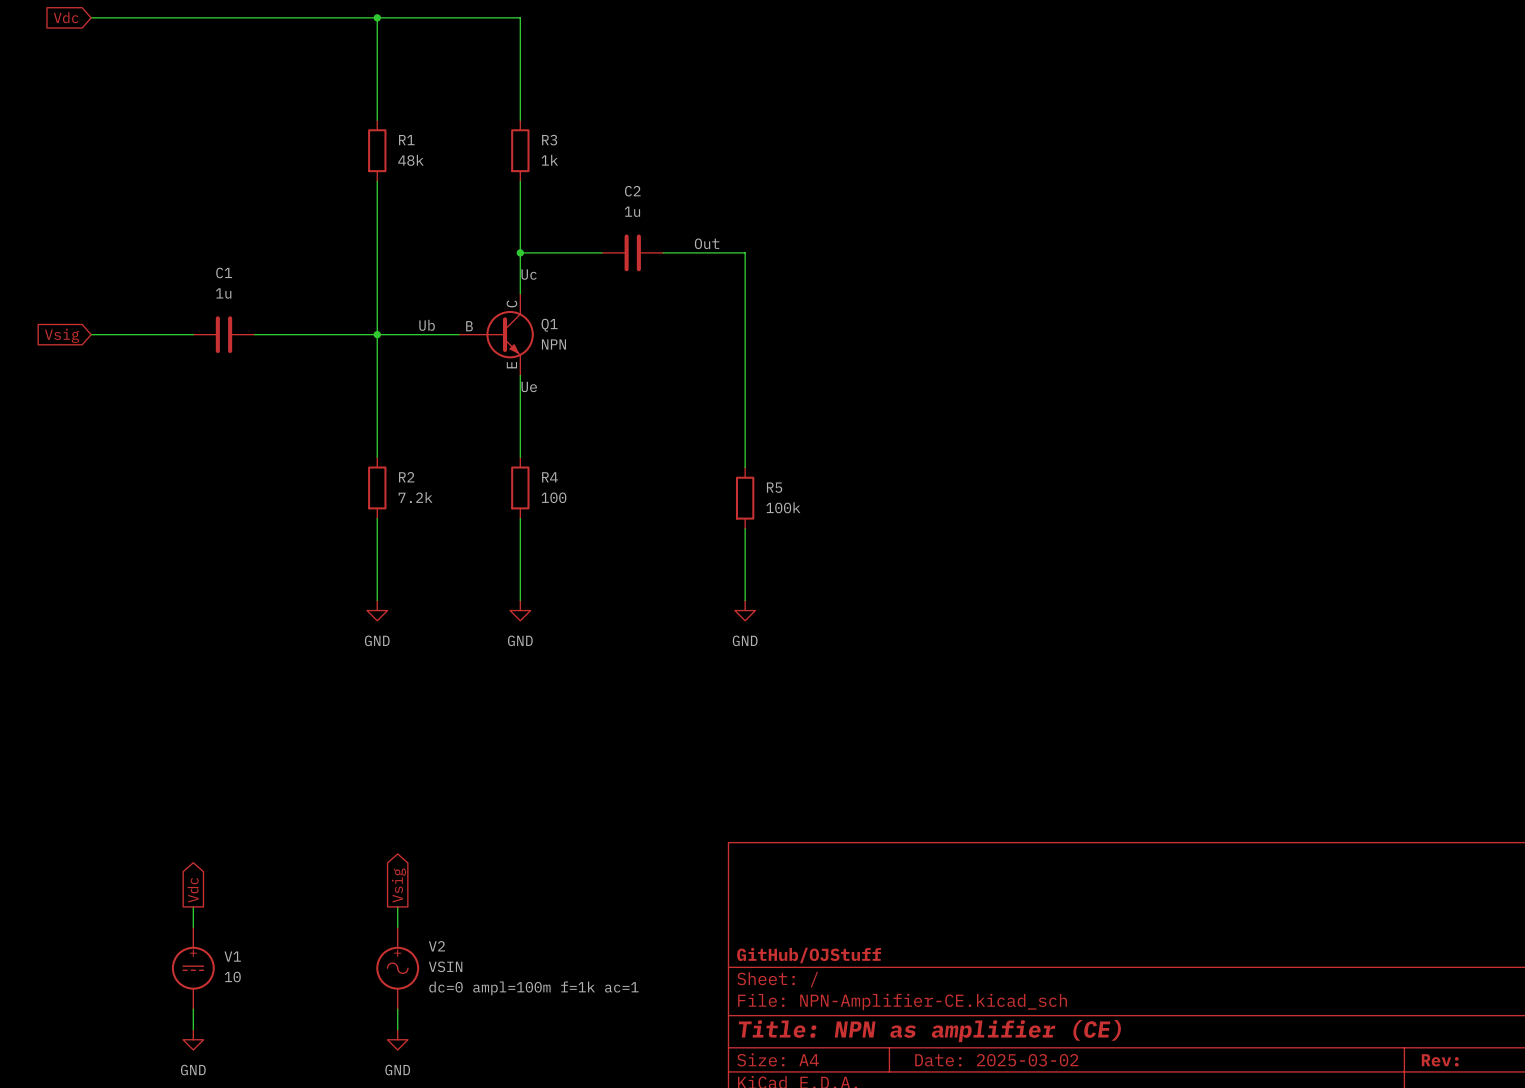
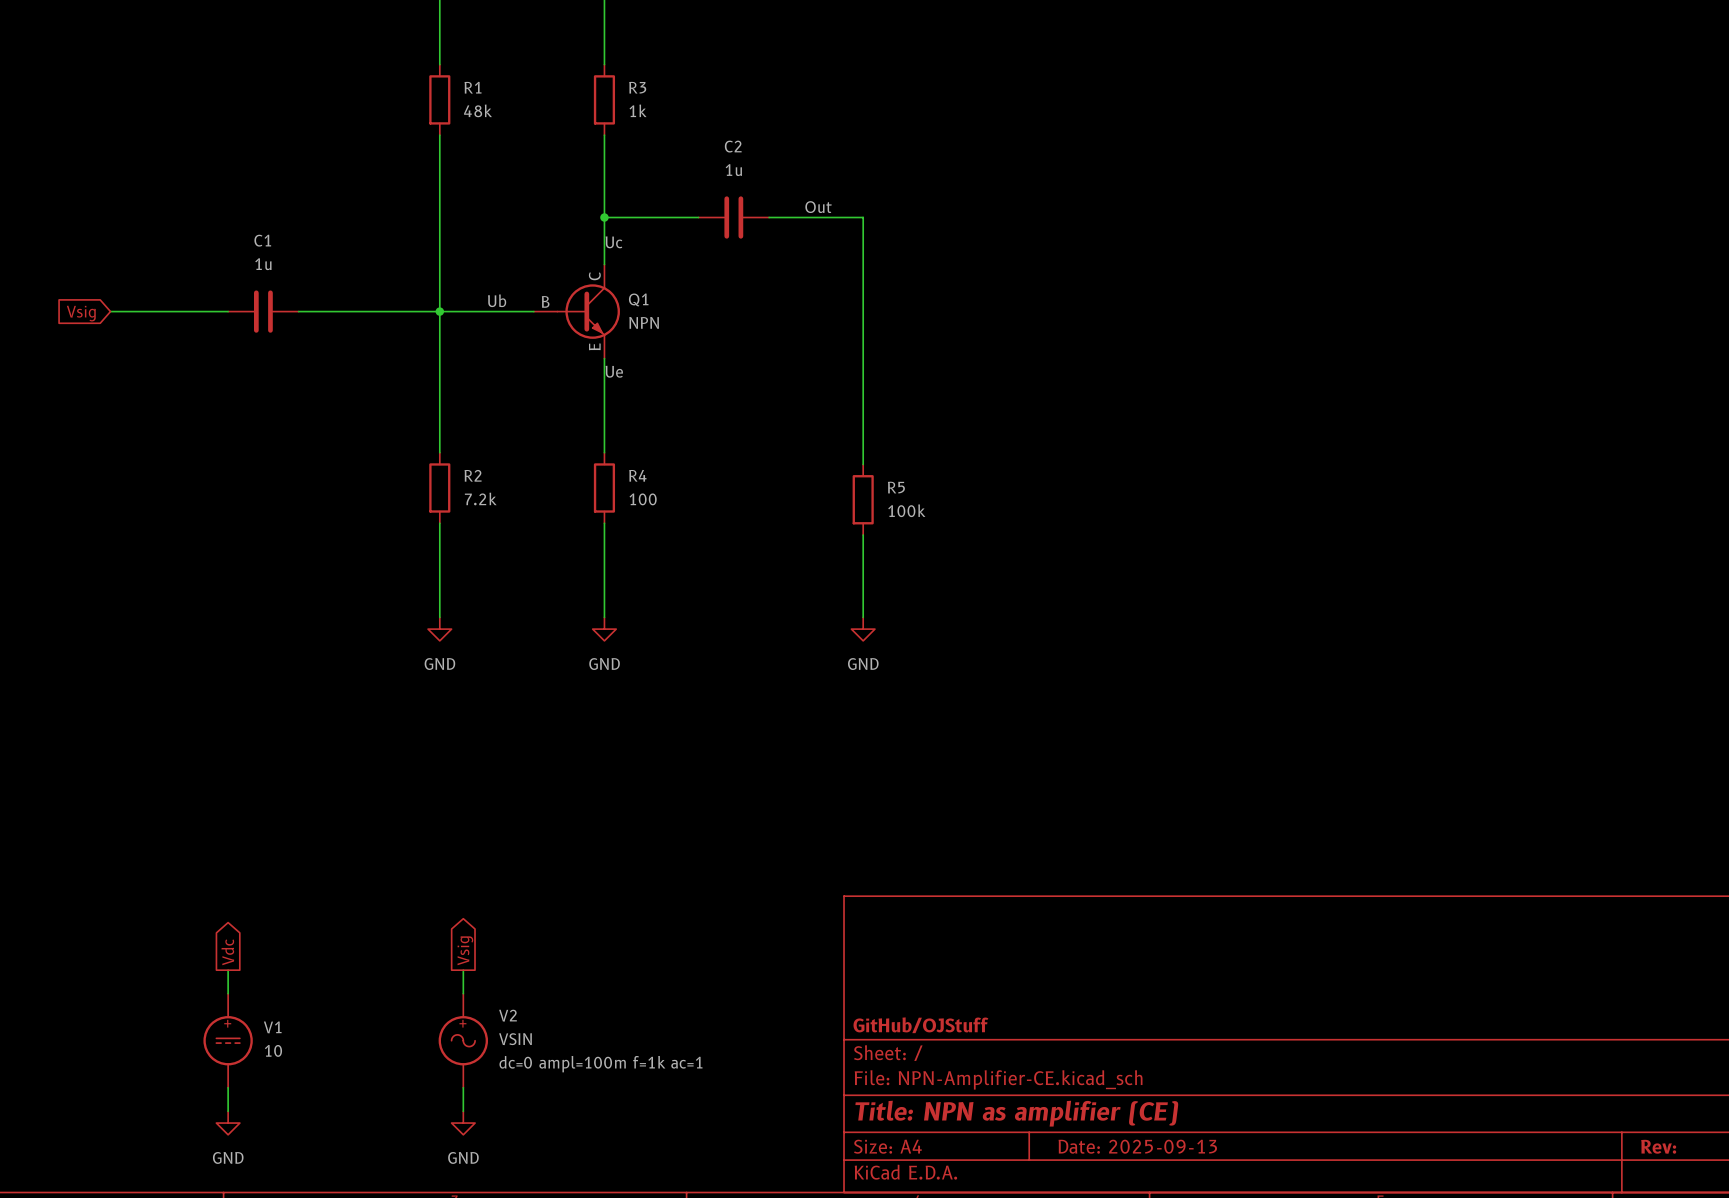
title block: Date: 2025-03-02 (996, 1060) -> Date: 2025-09-13 (1137, 1146)

